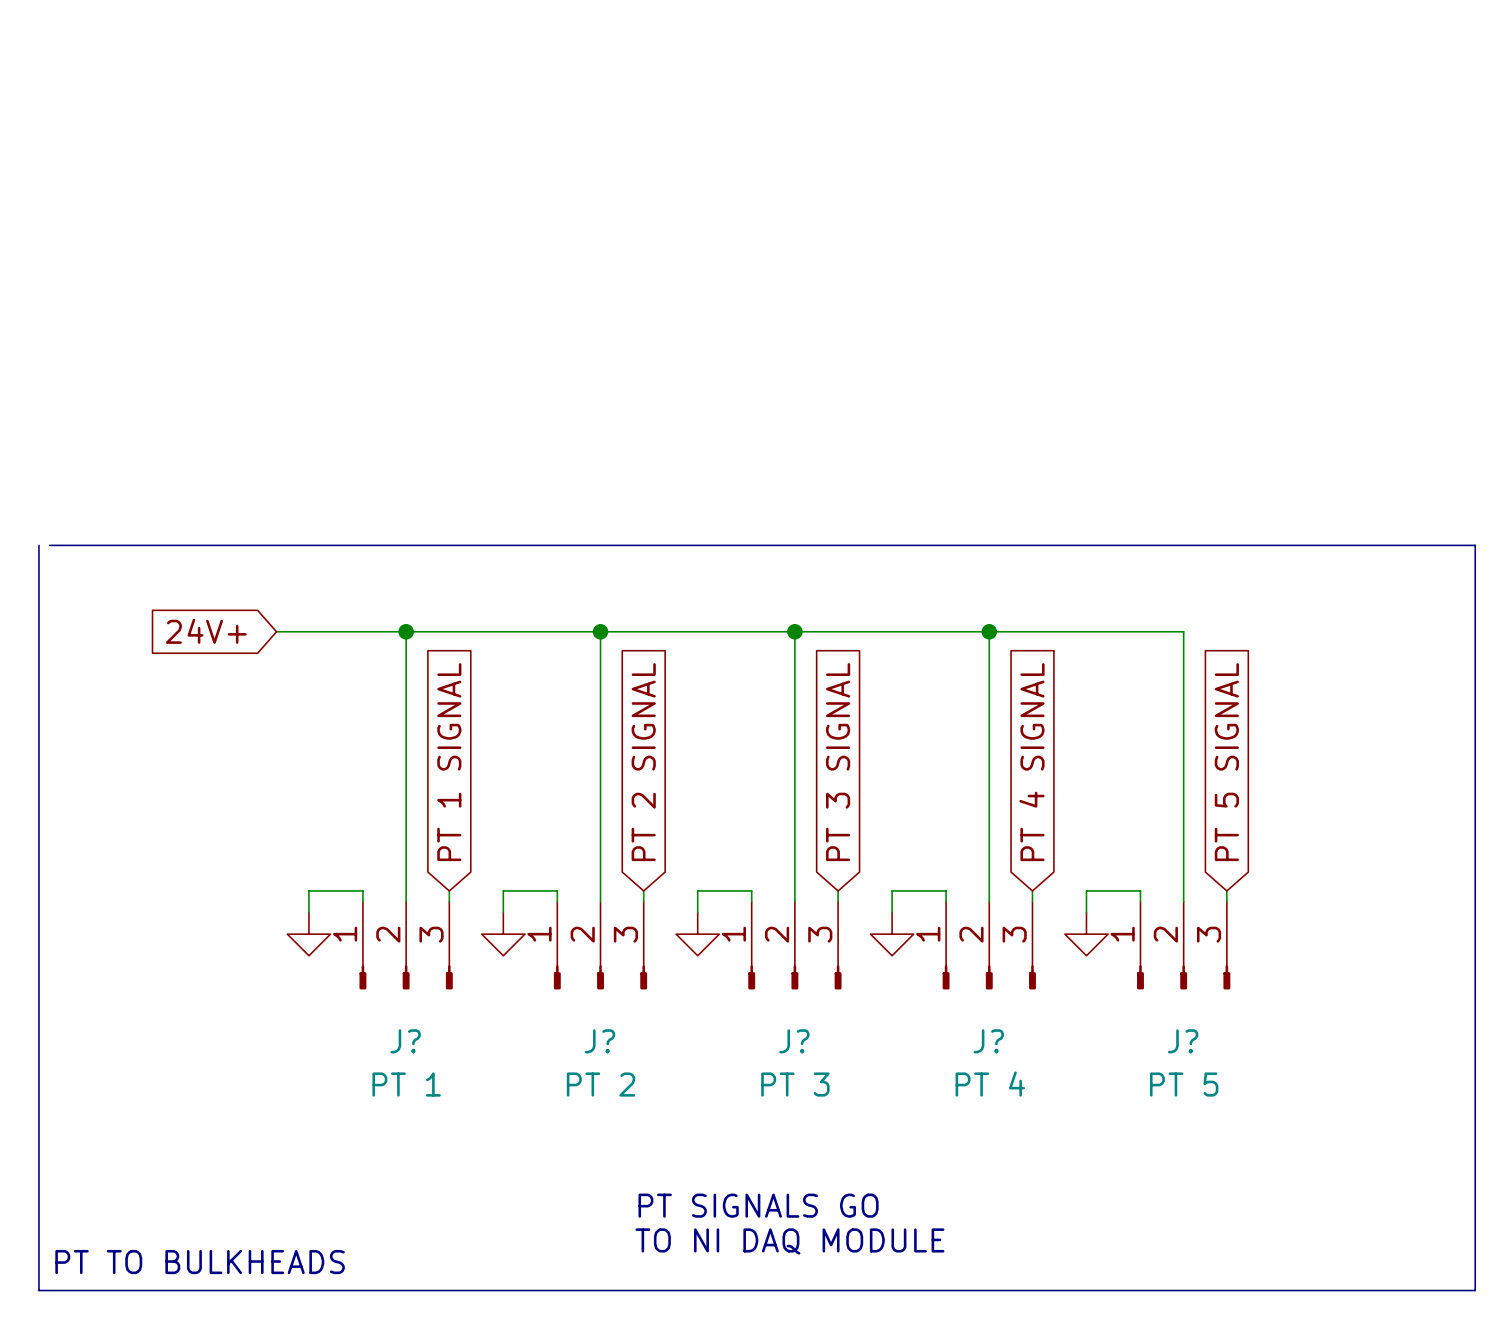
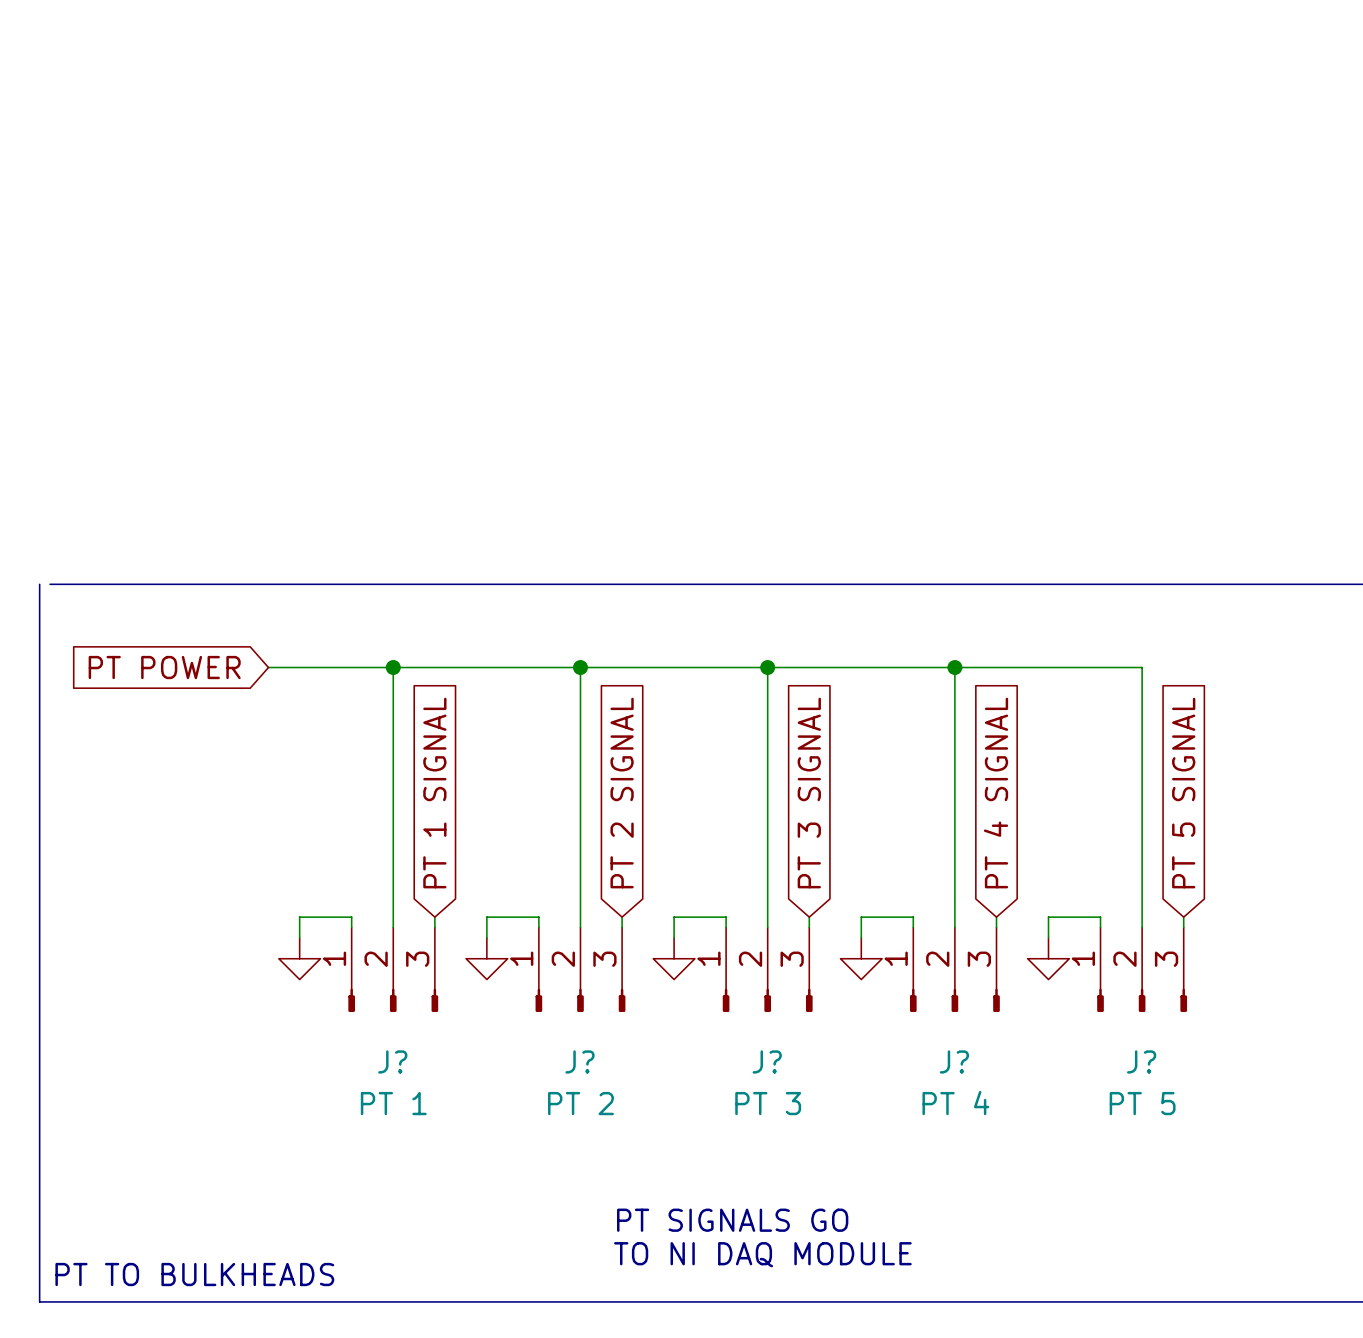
global label: 24V+ (206, 631) -> PT POWER (164, 667)

